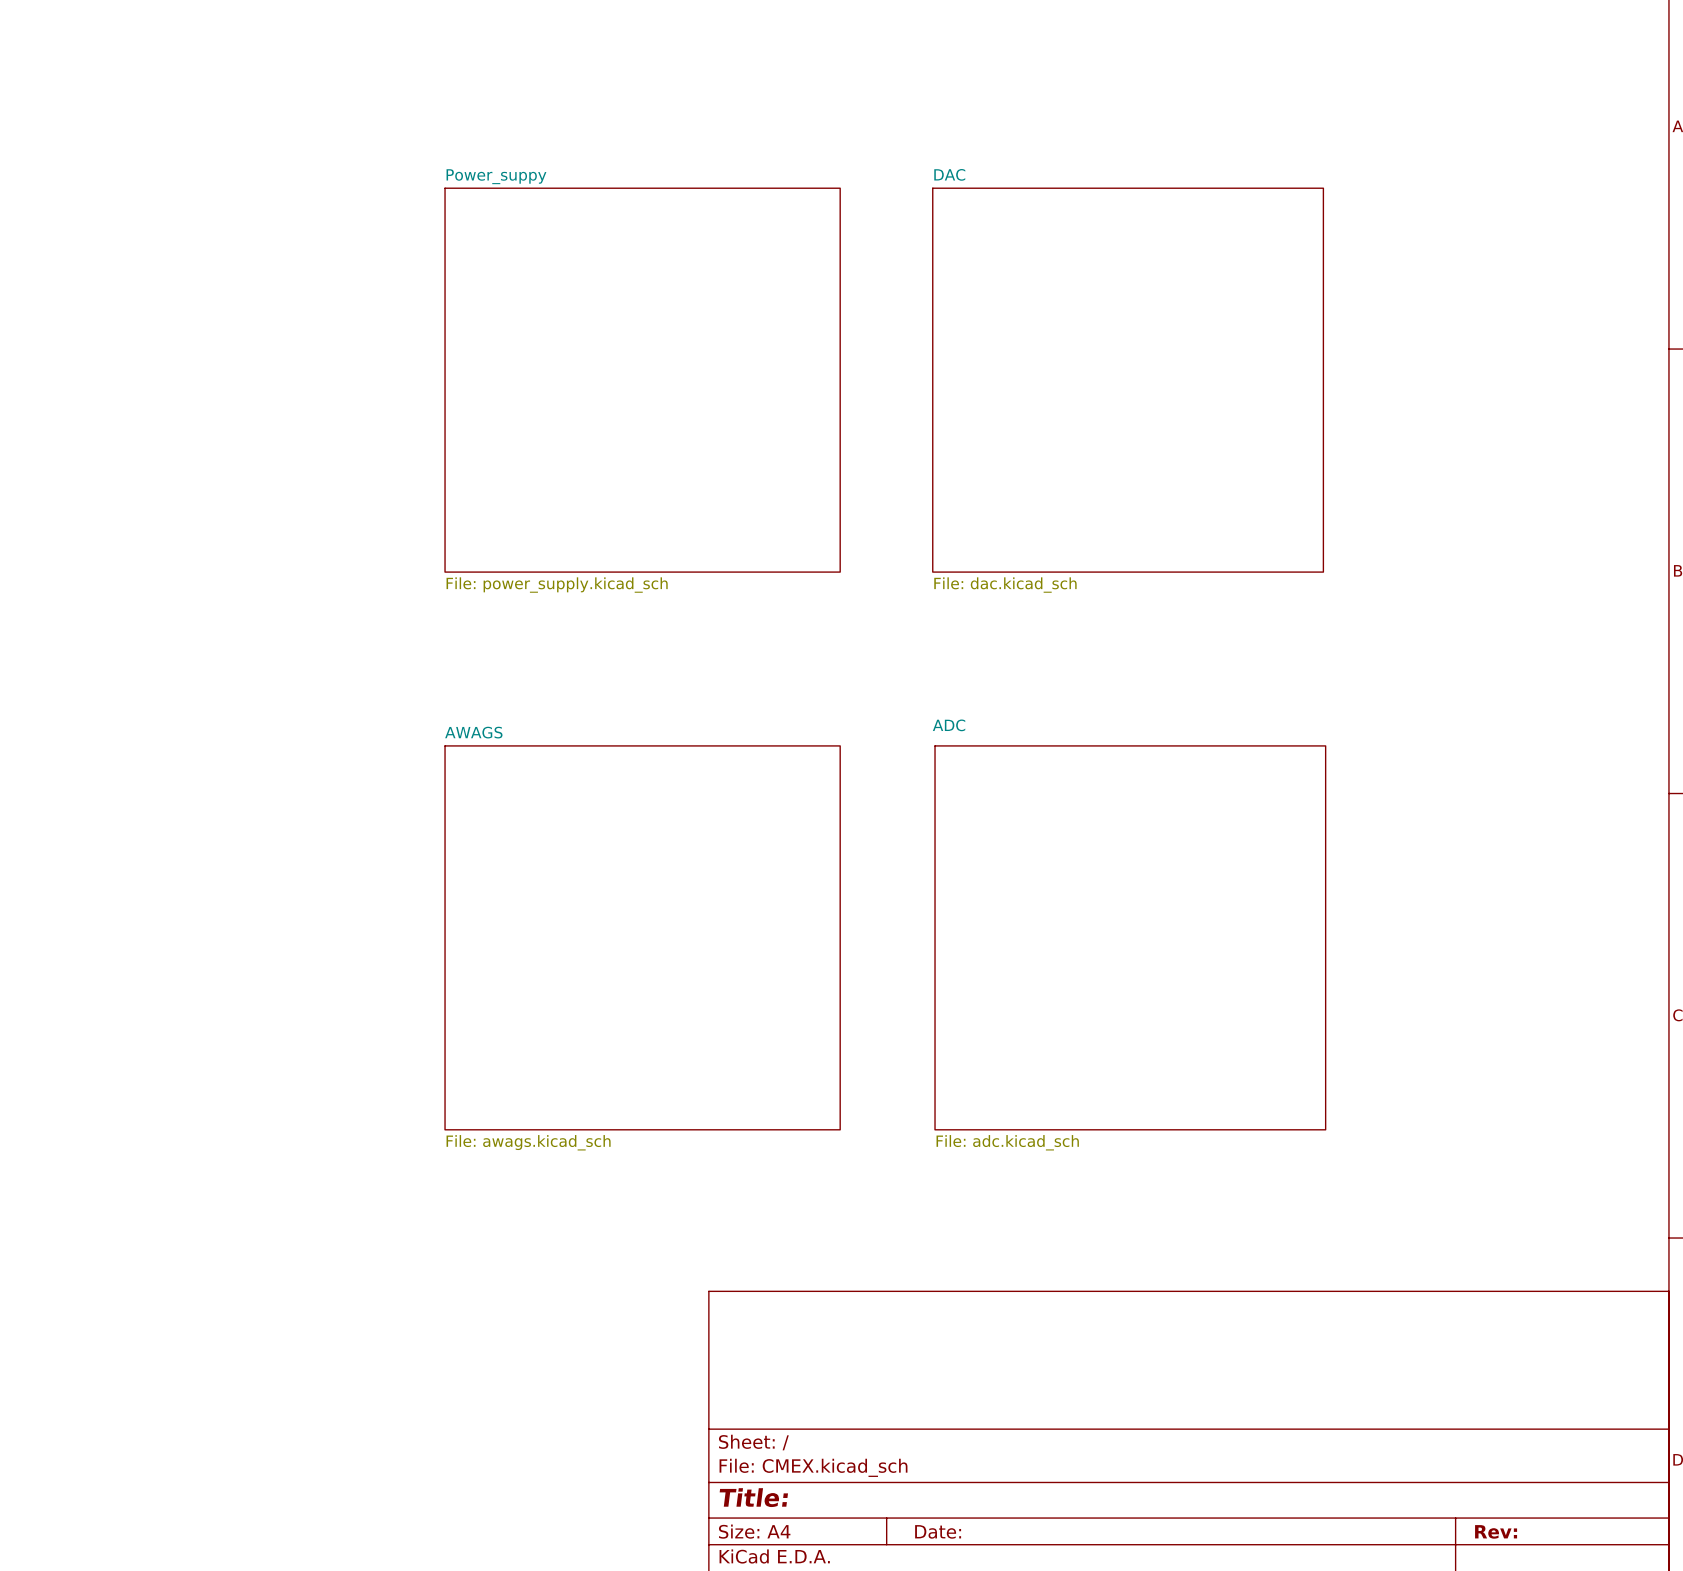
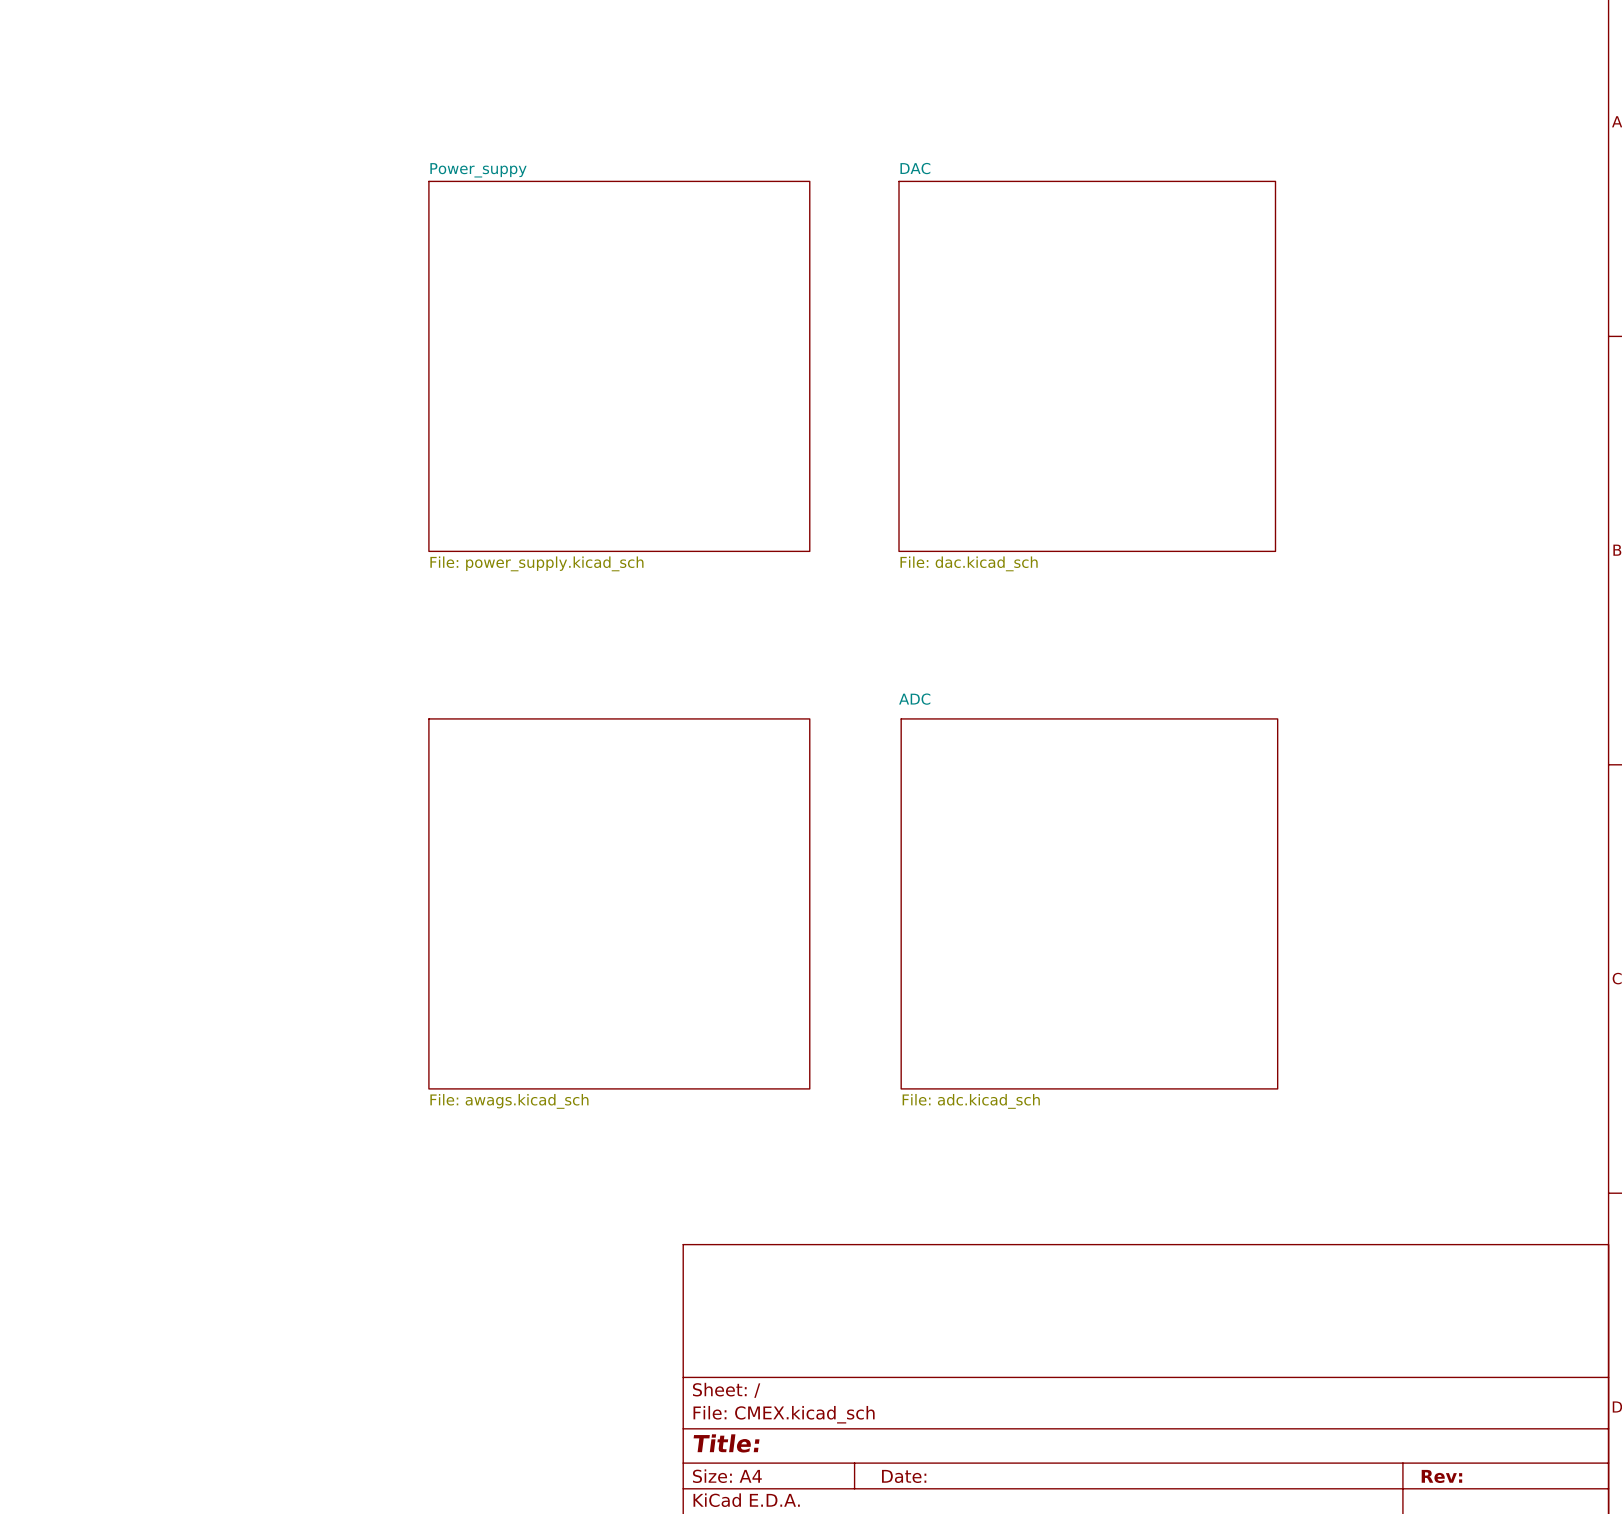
sheet AWAGS name: AWAGS (473, 732) -> none

